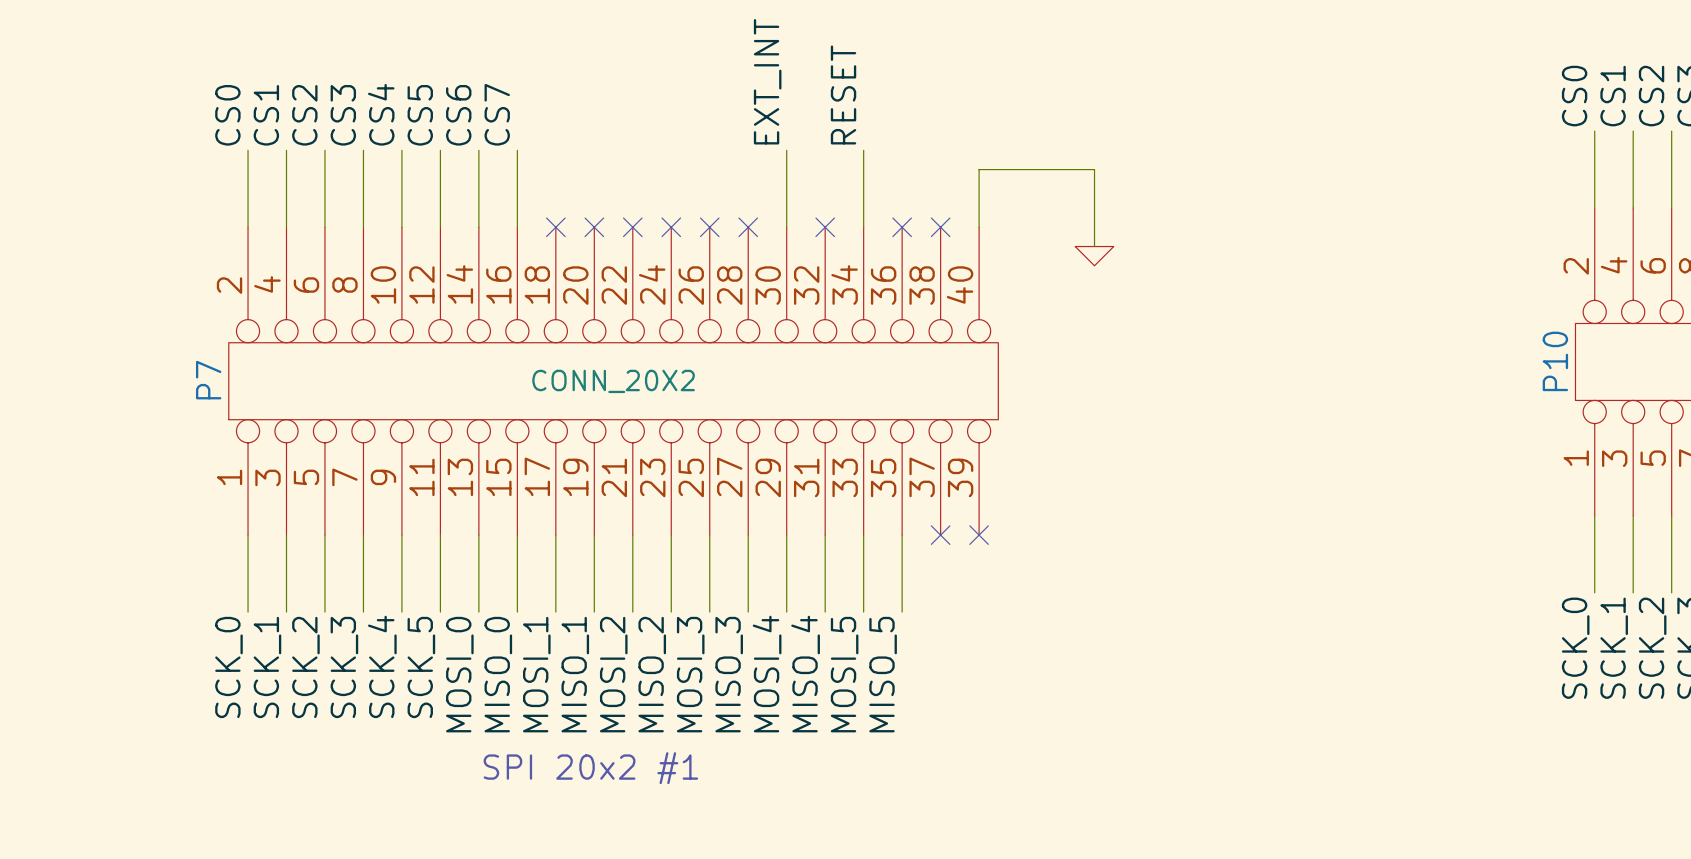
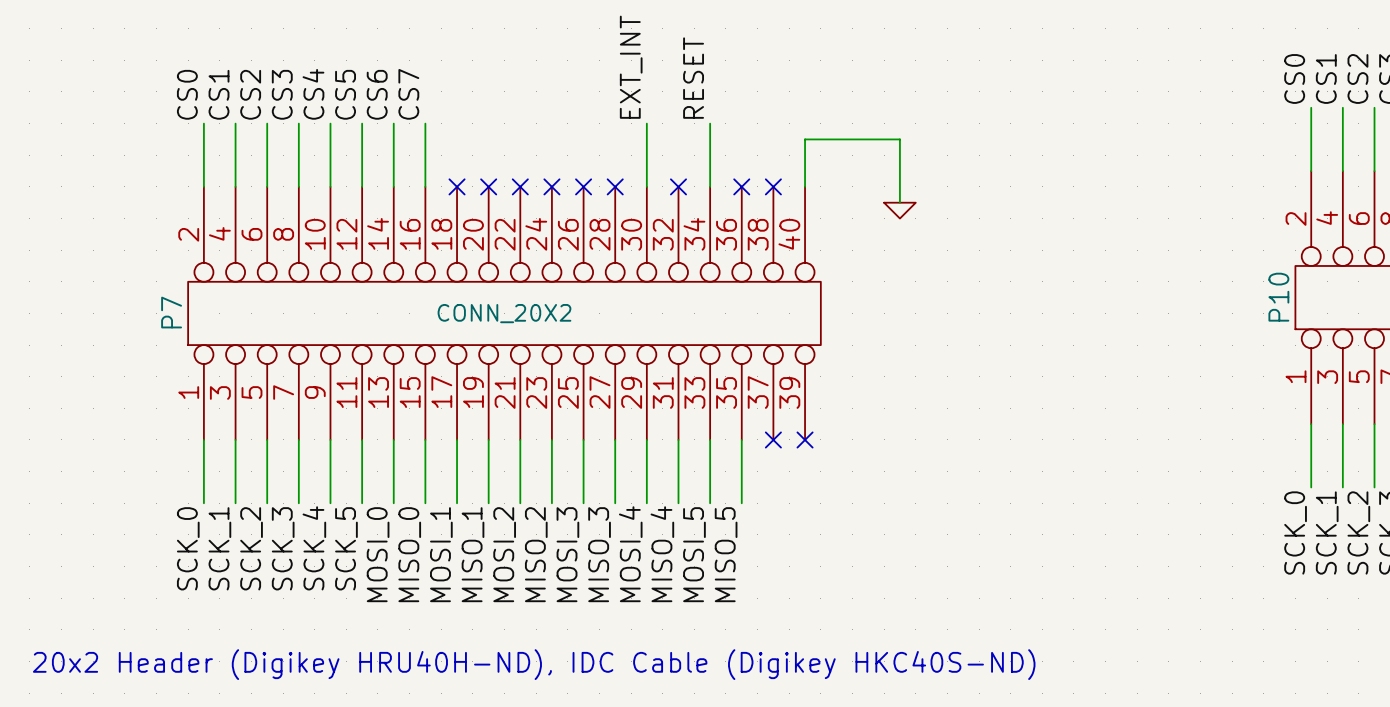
text: SPI 20x2 #1 (590, 768) -> none
text: none -> 20x2 Header (Digikey HRU40H-ND), IDC Cable (Digikey HKC40S-ND) (534, 664)

